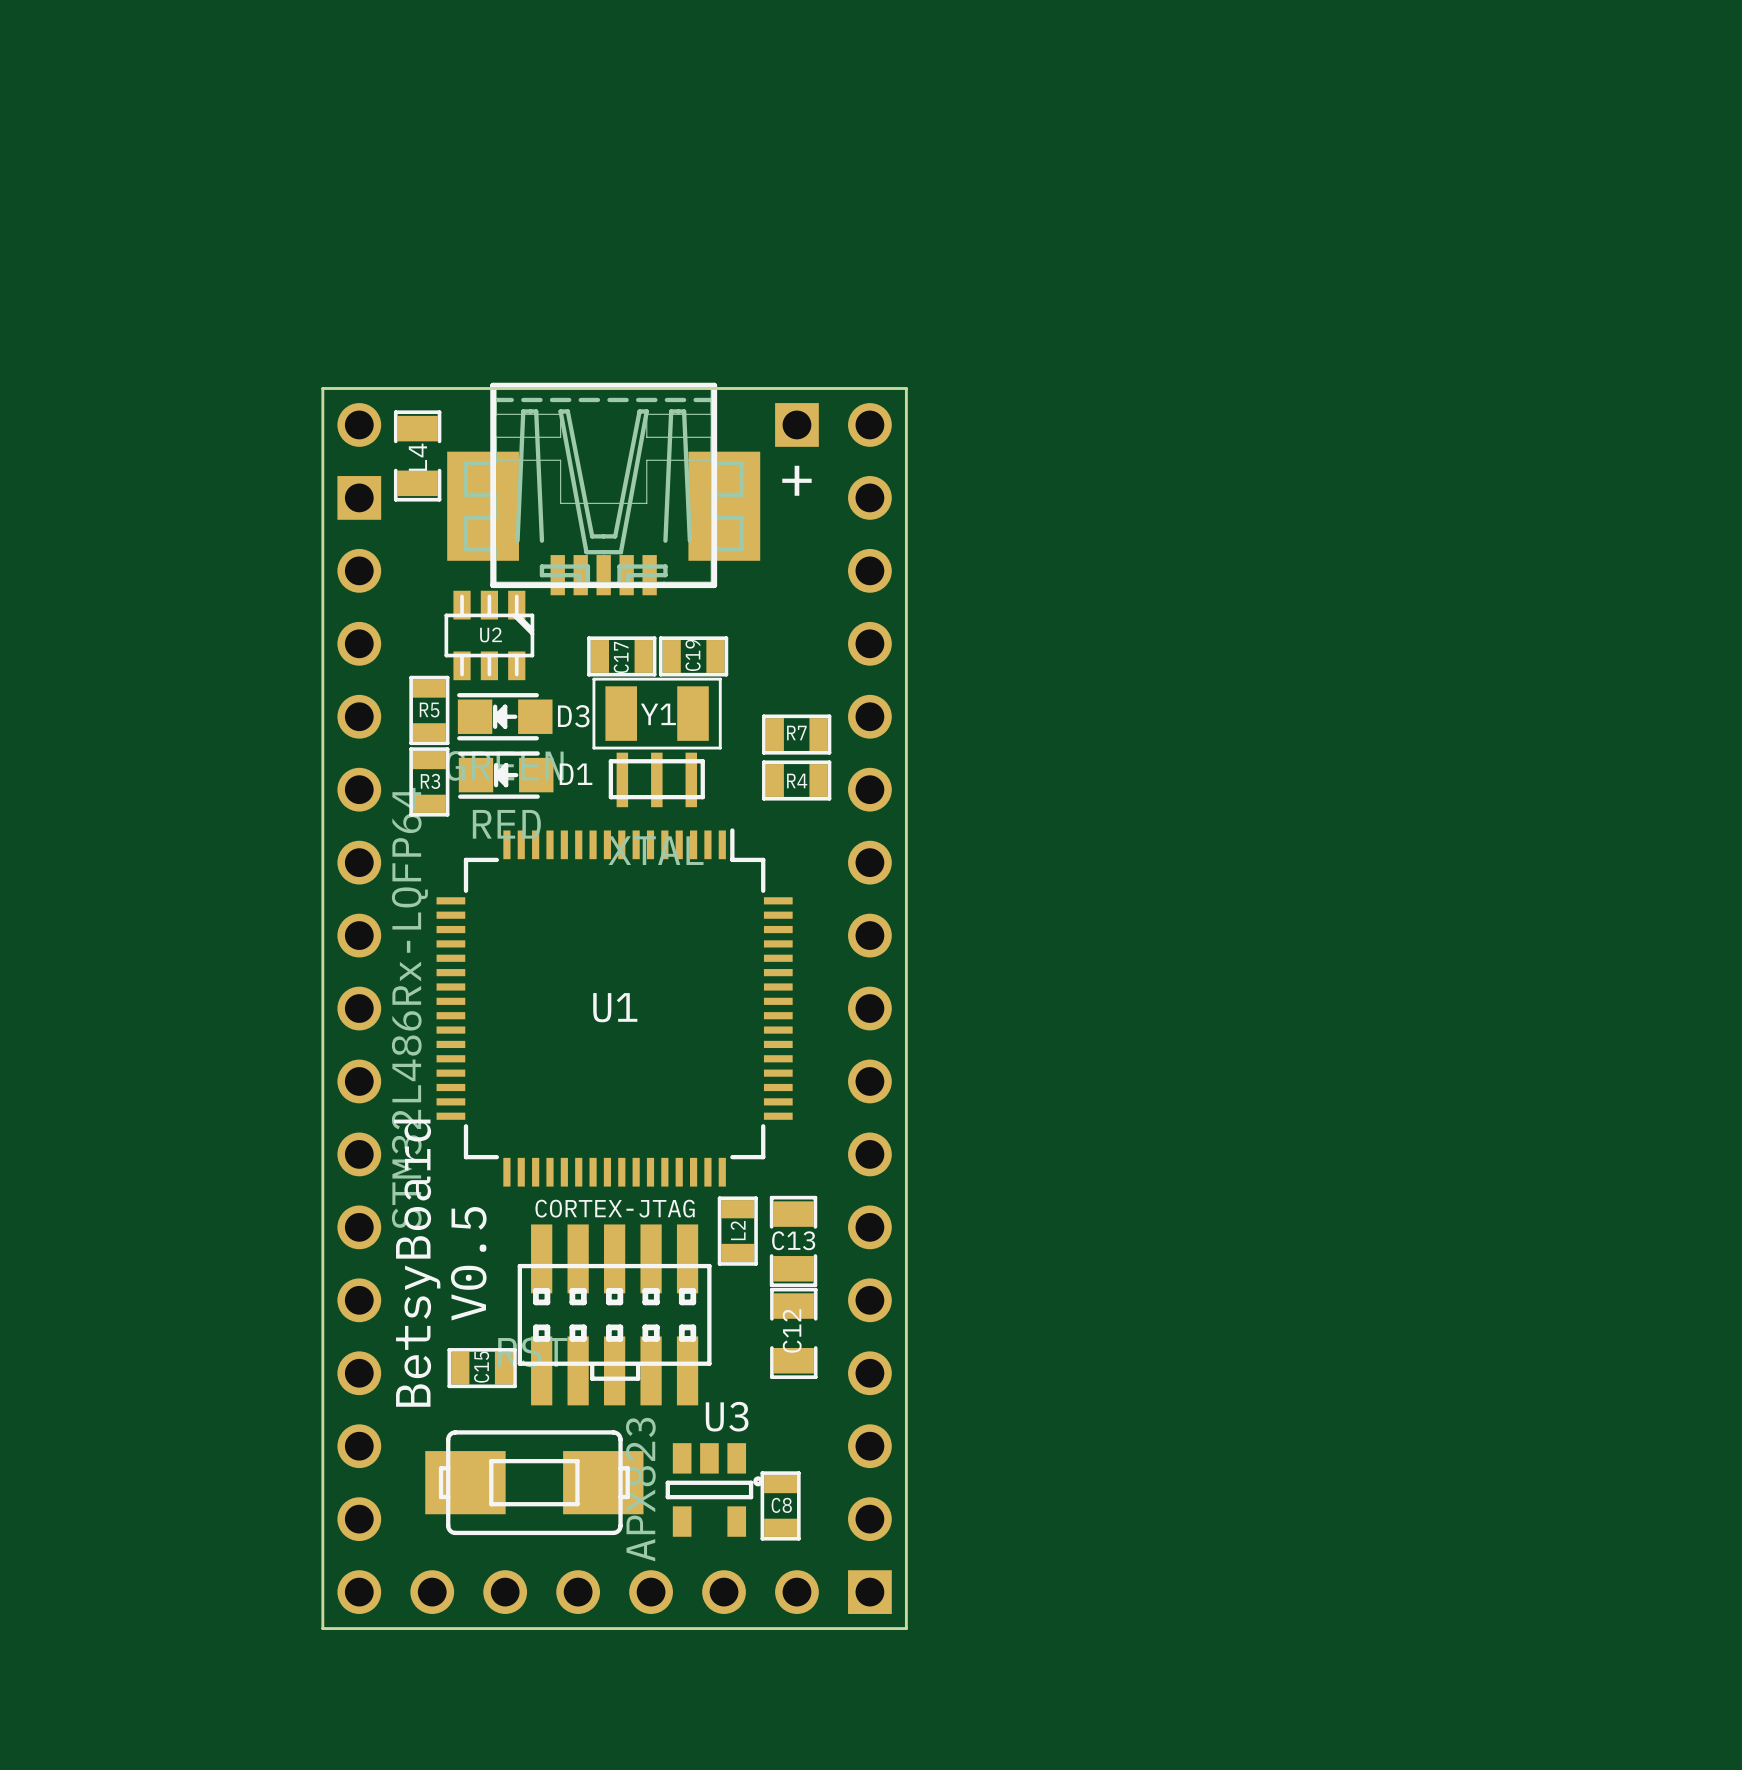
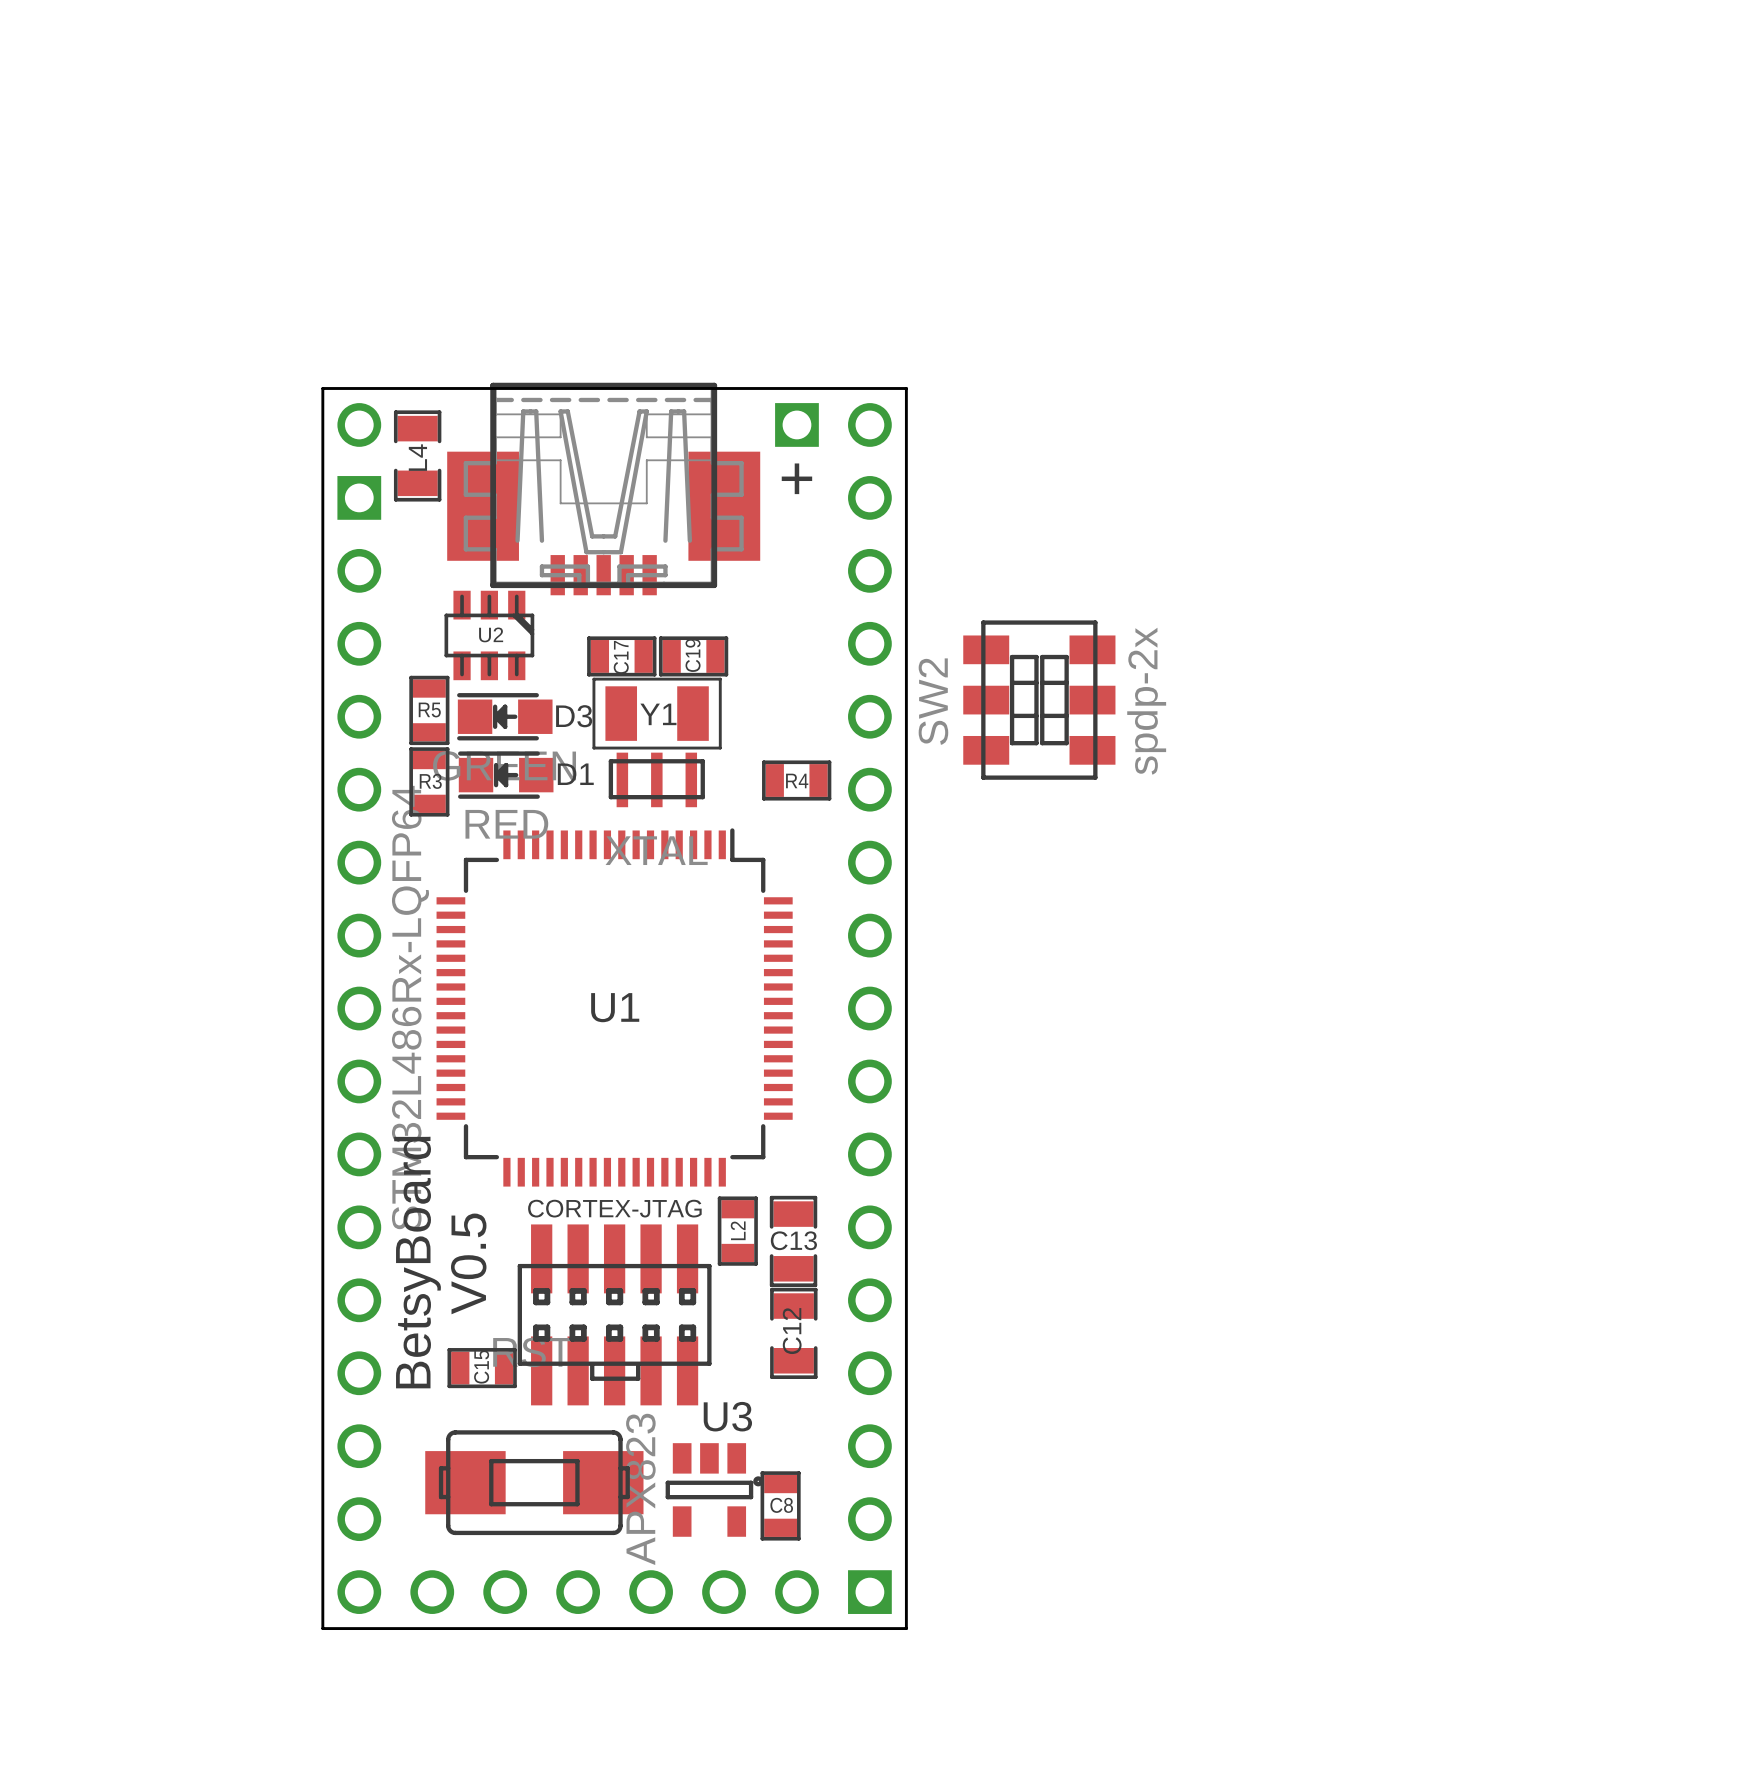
SW2: none -> spdp-2x (1039, 700)
R7: (796, 734) -> none

